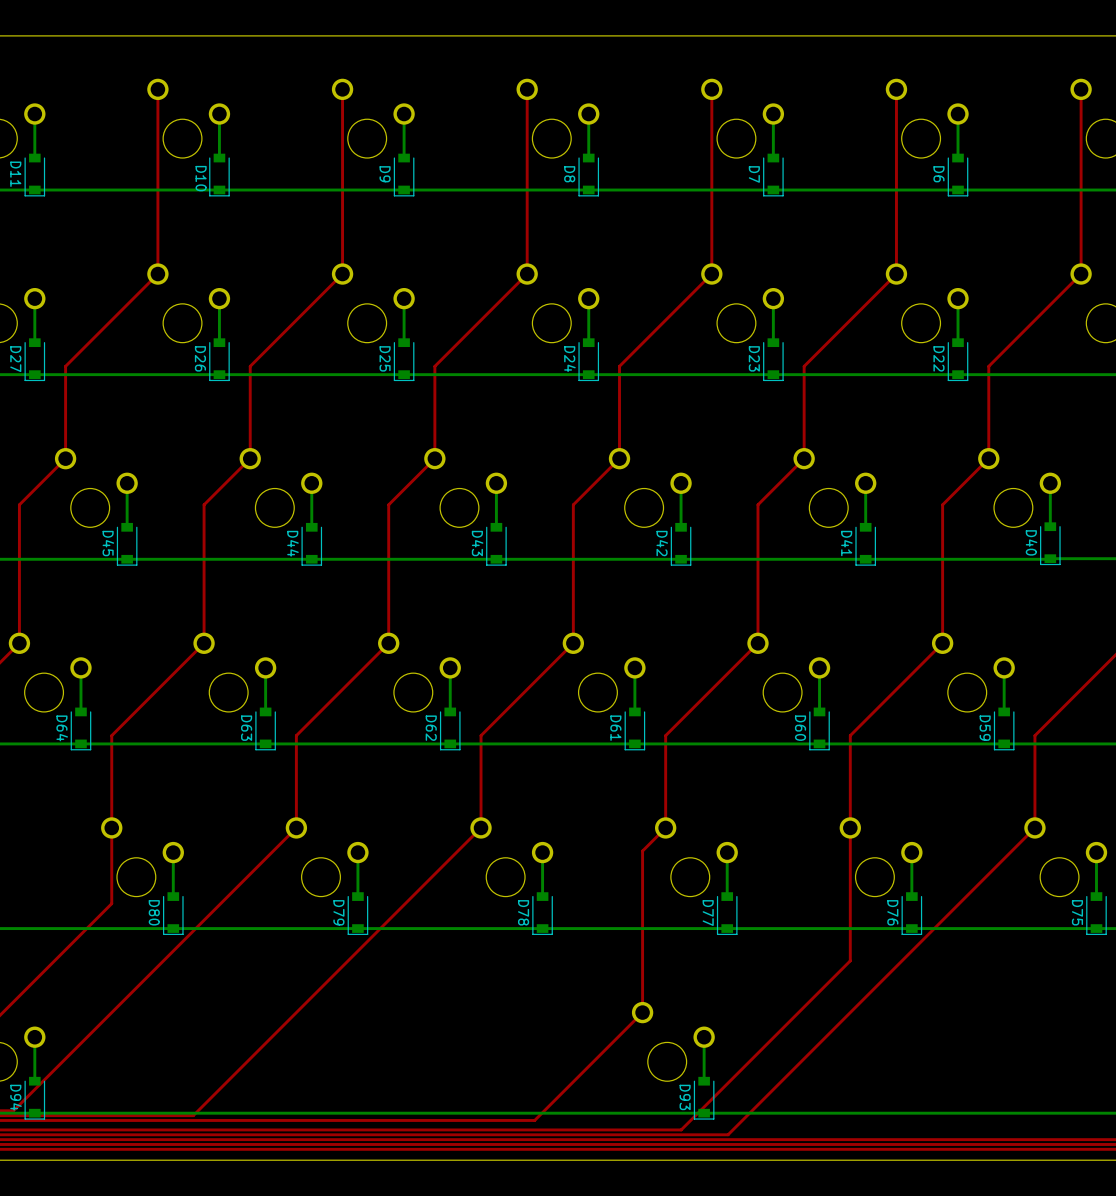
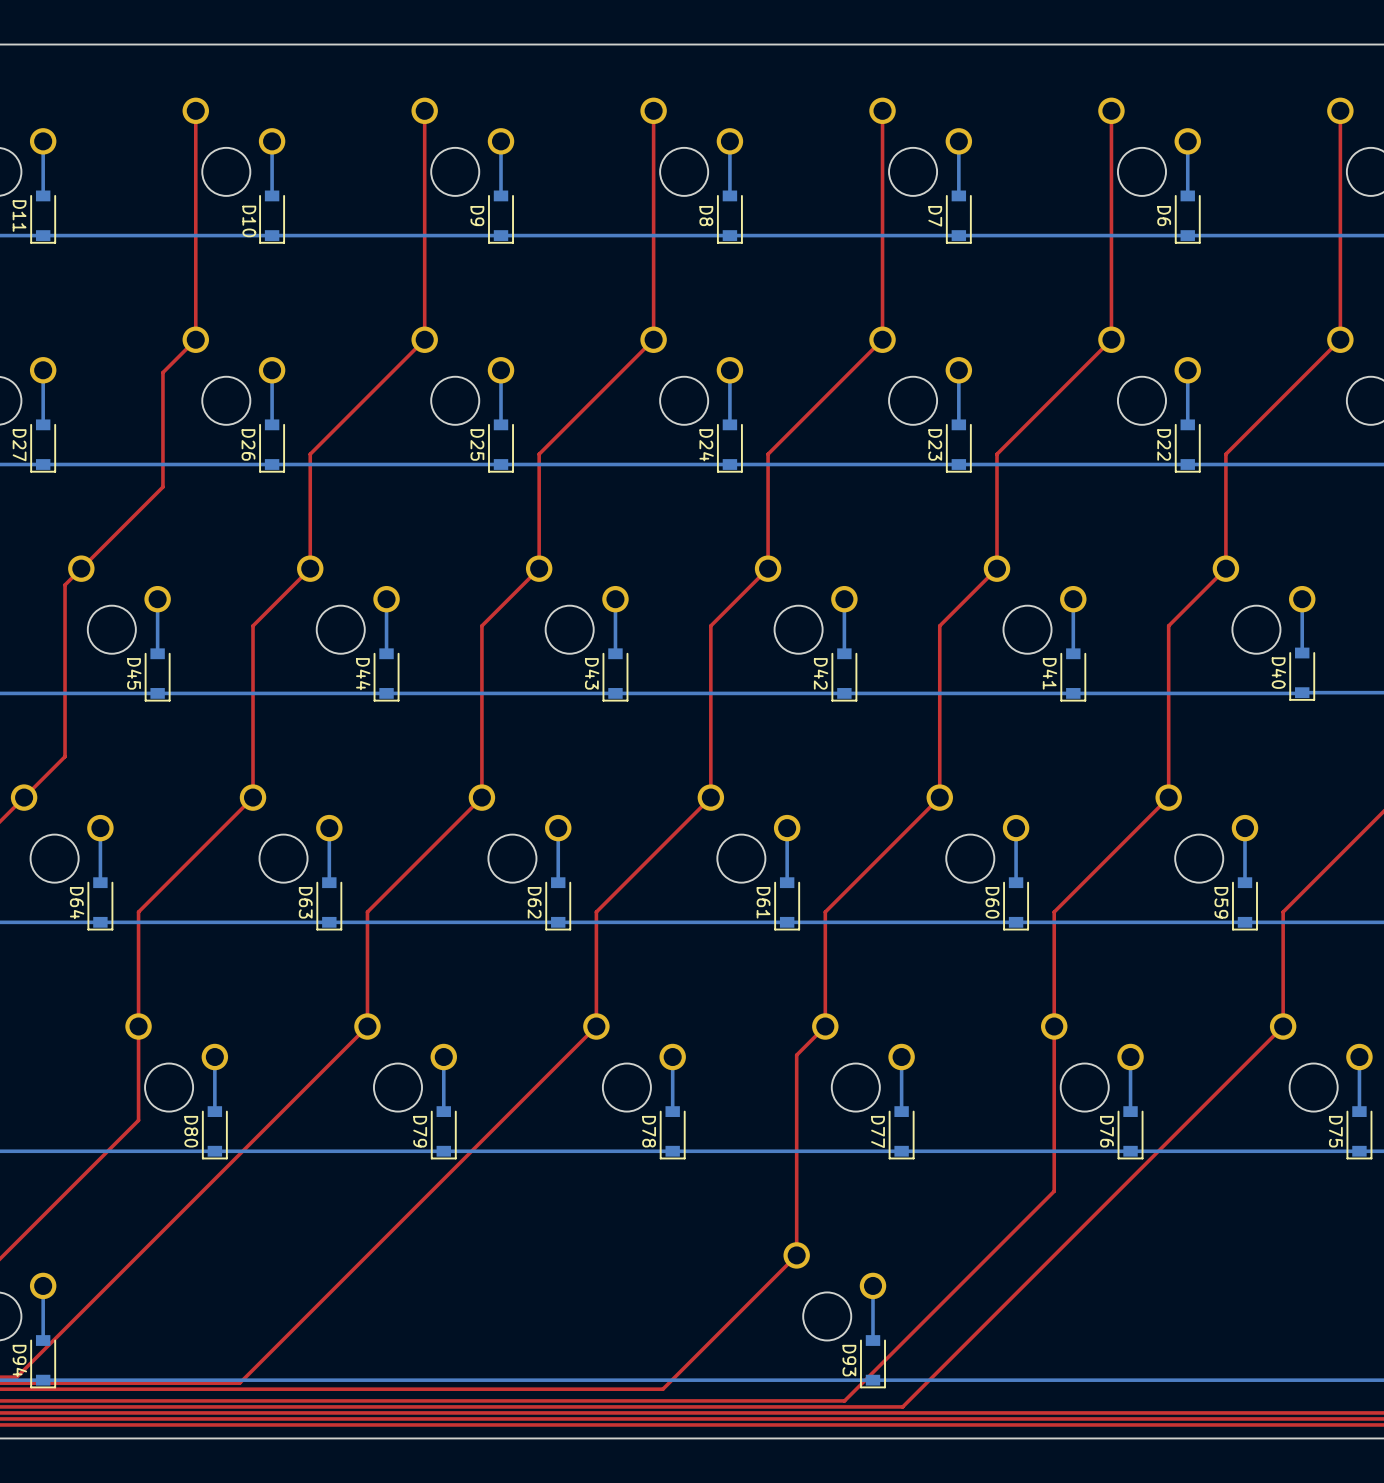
top track: (131, 300) (65, 366) (65, 458) -> (162, 372) (162, 487) (81, 568)
top track: (52, 471) (19, 504) (19, 643) -> (65, 584) (65, 756) (24, 797)

